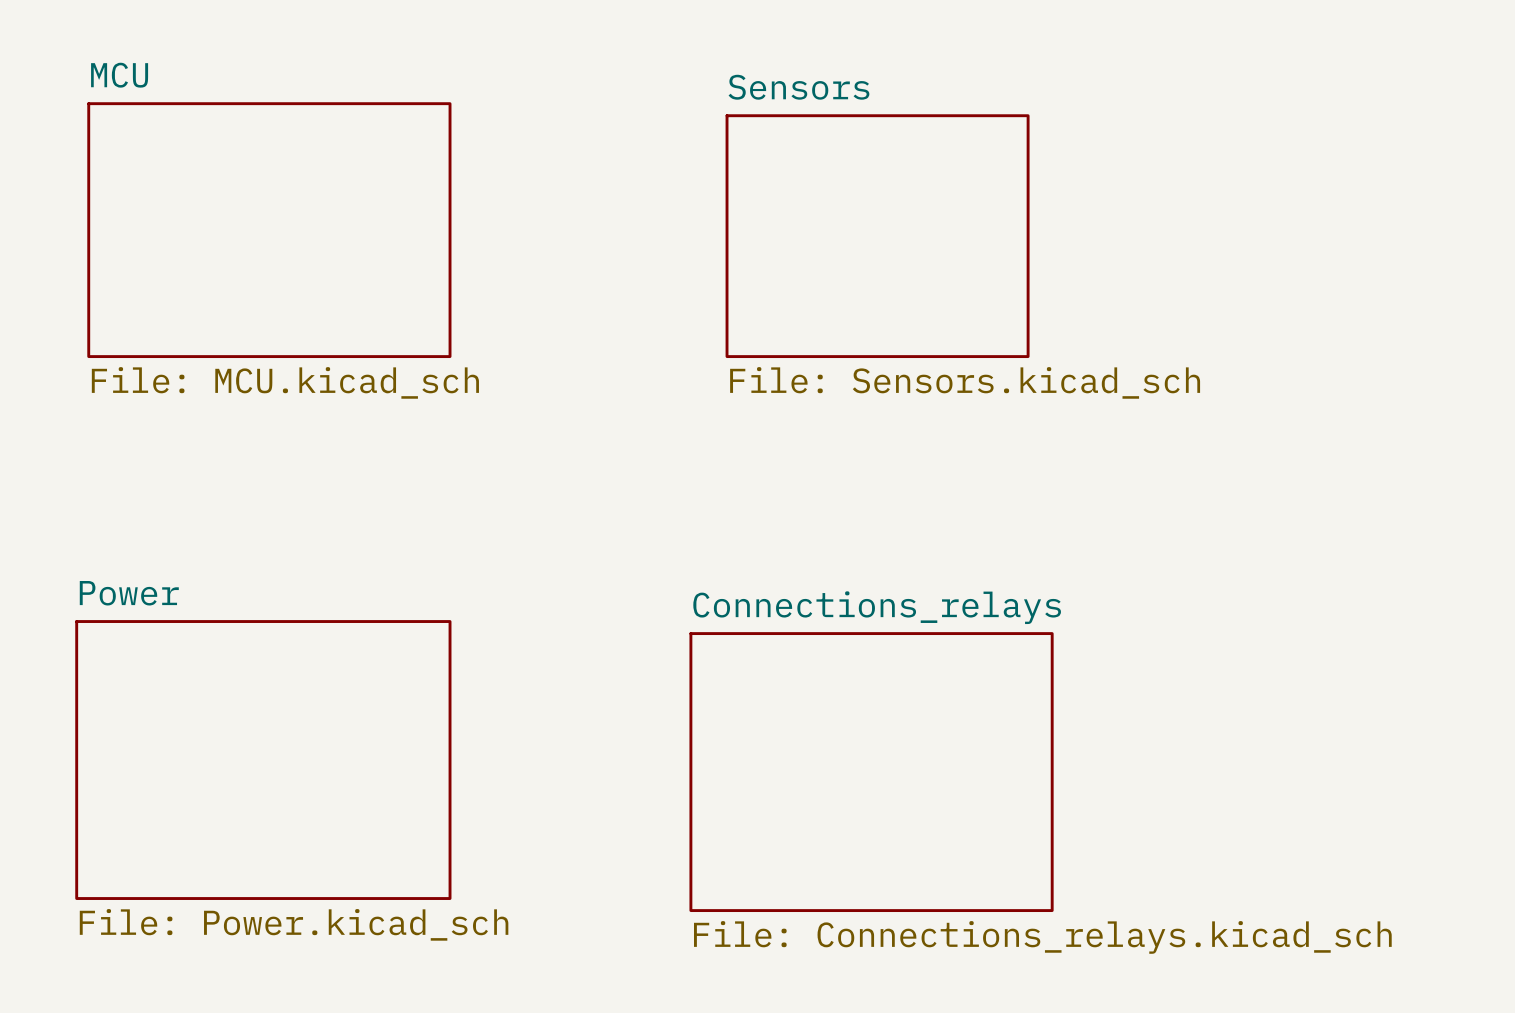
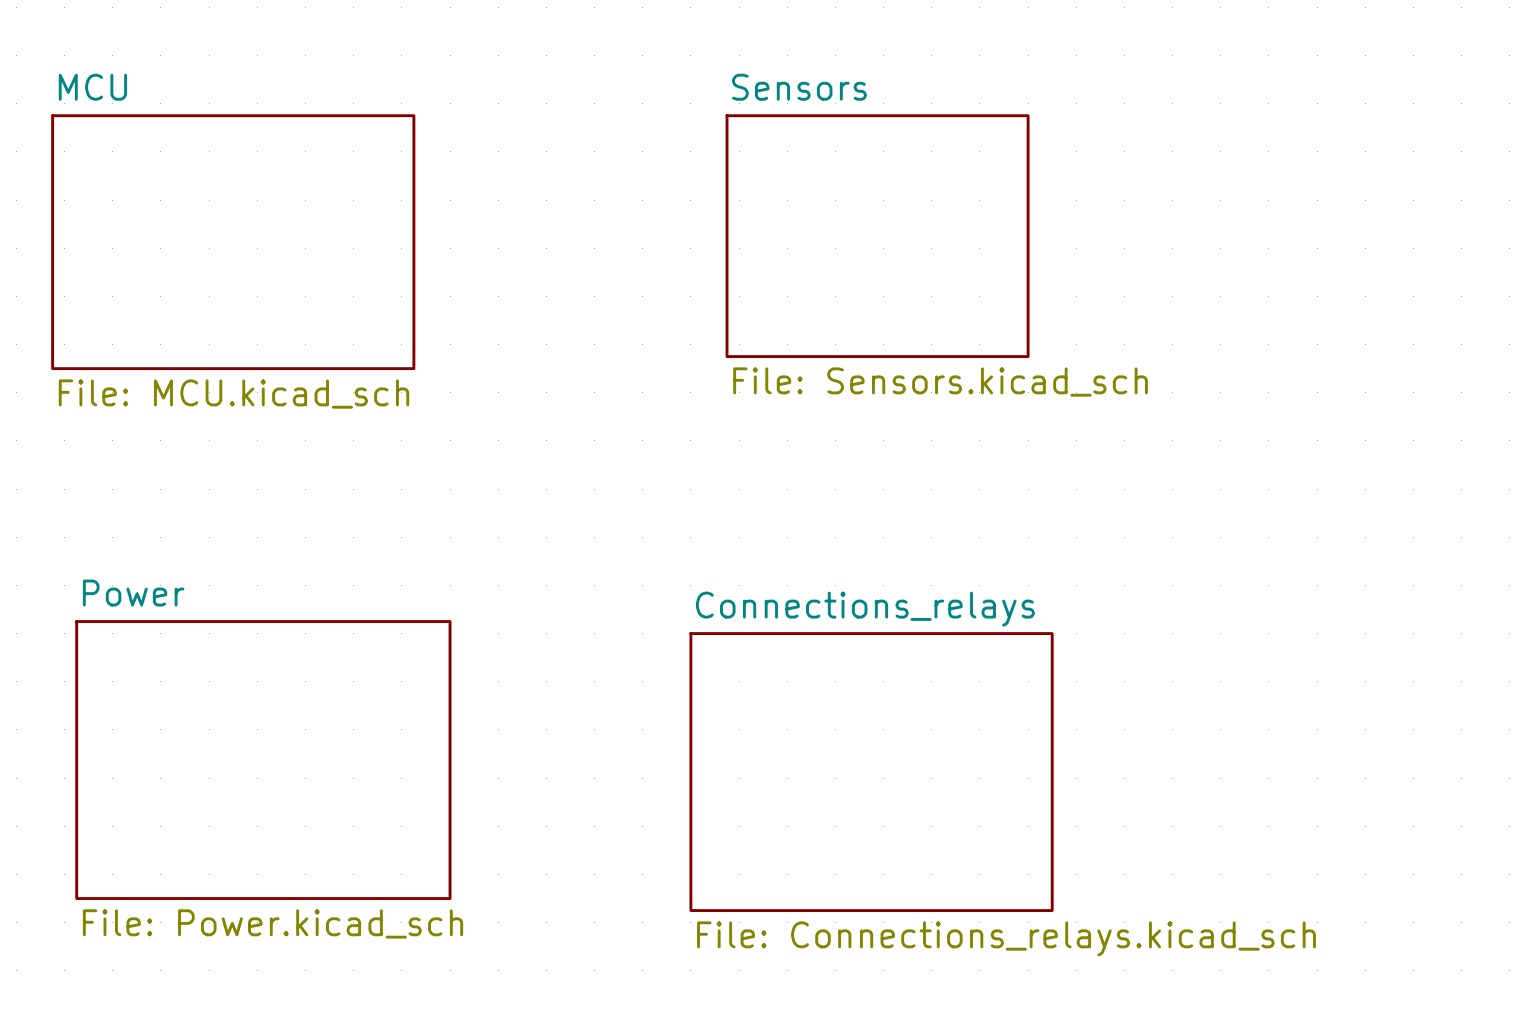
sheet MCU position: (269, 230) -> (233, 242)

